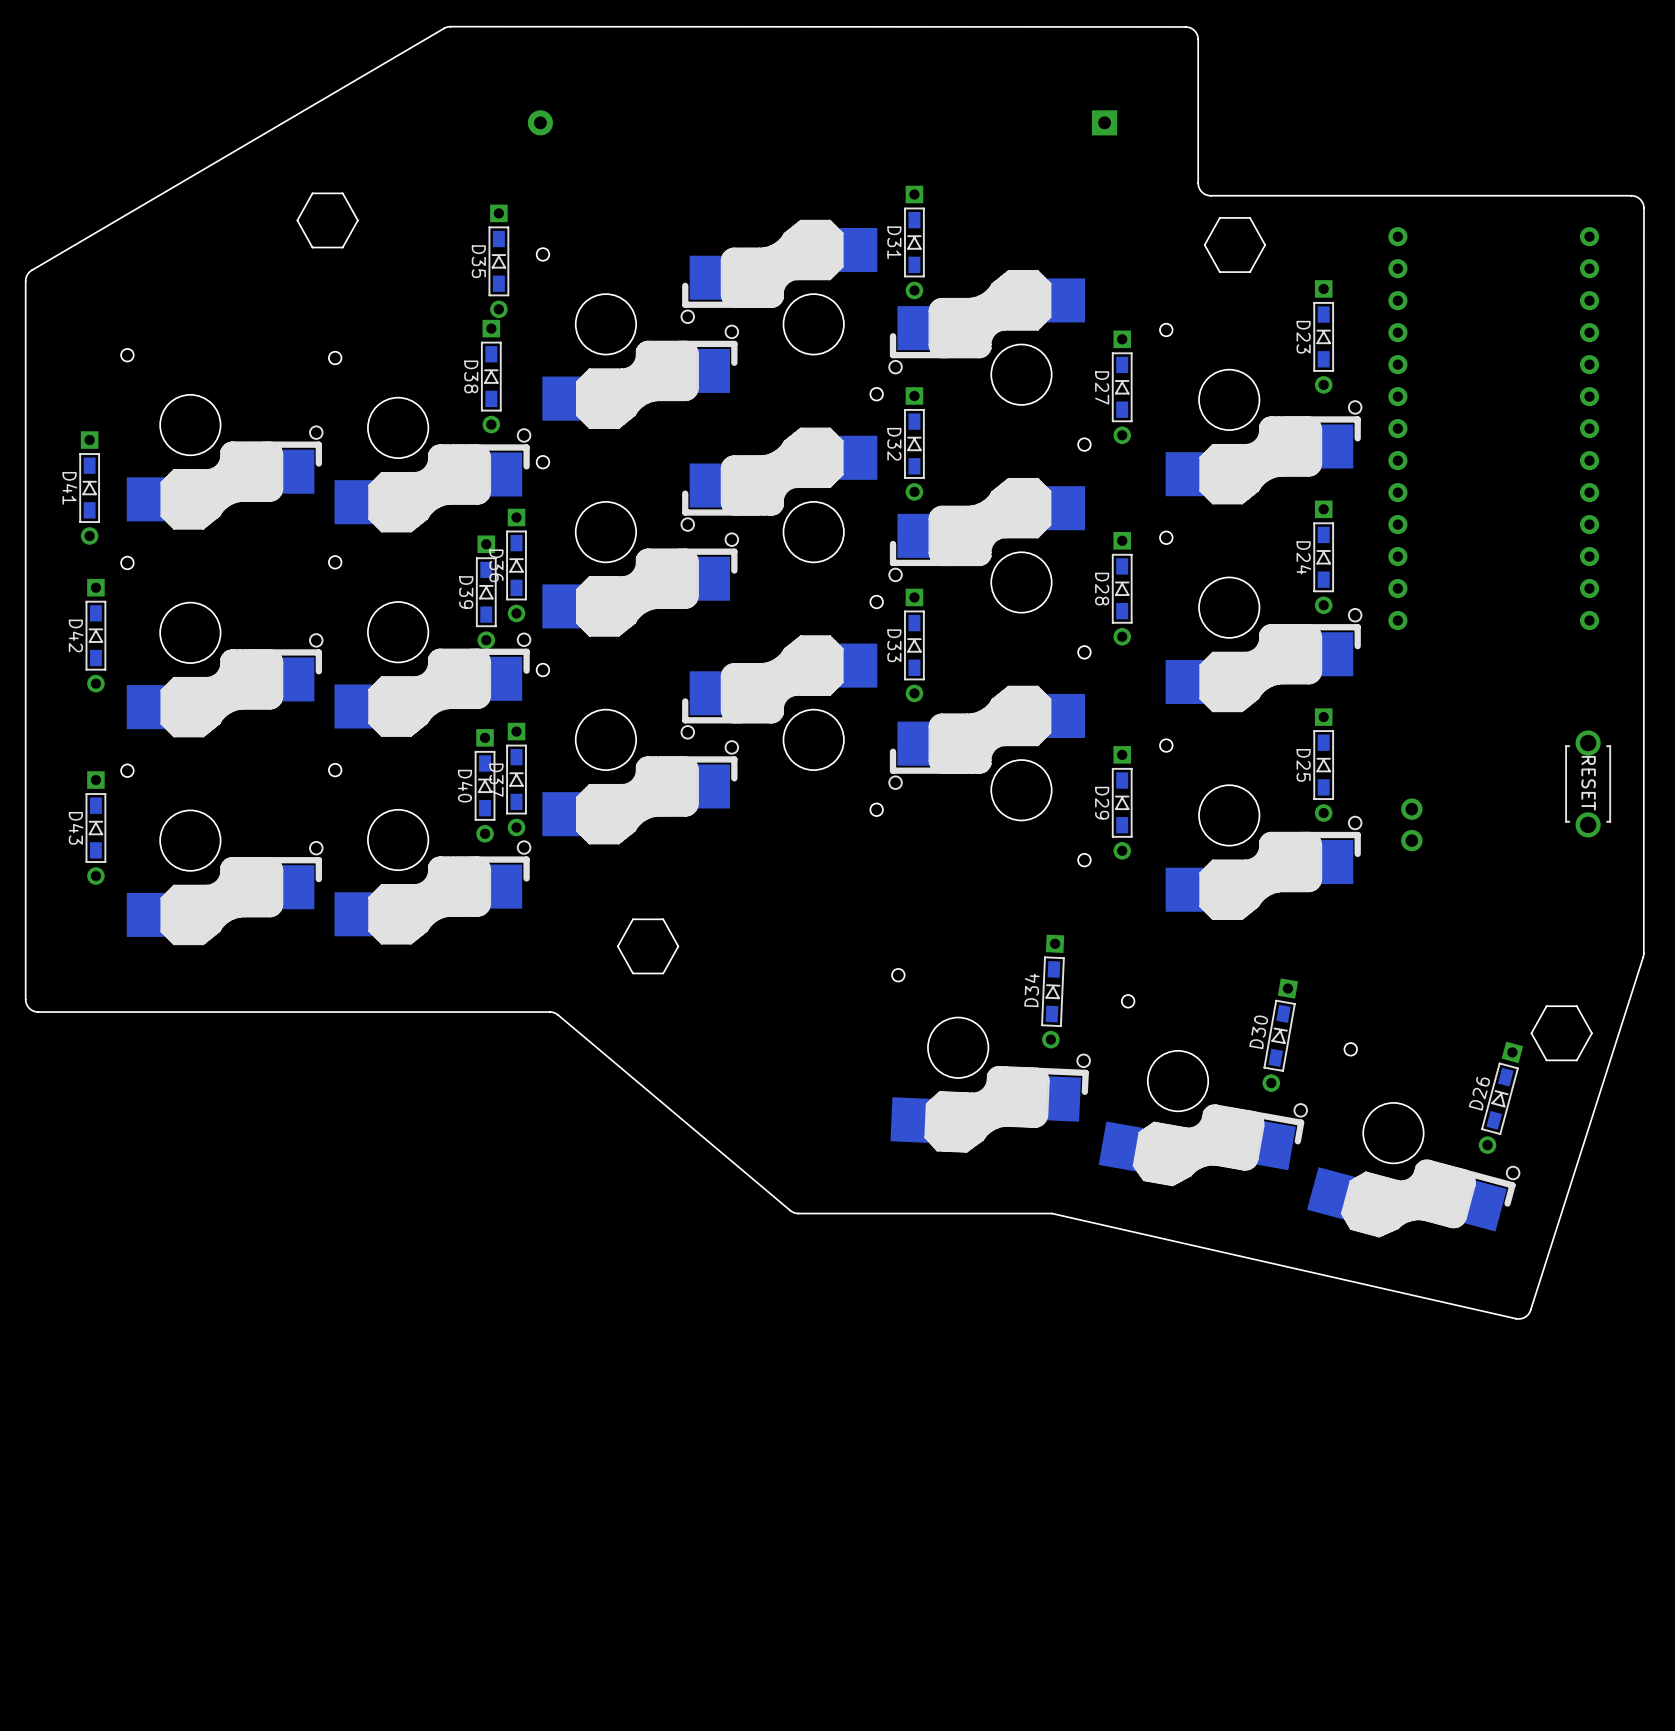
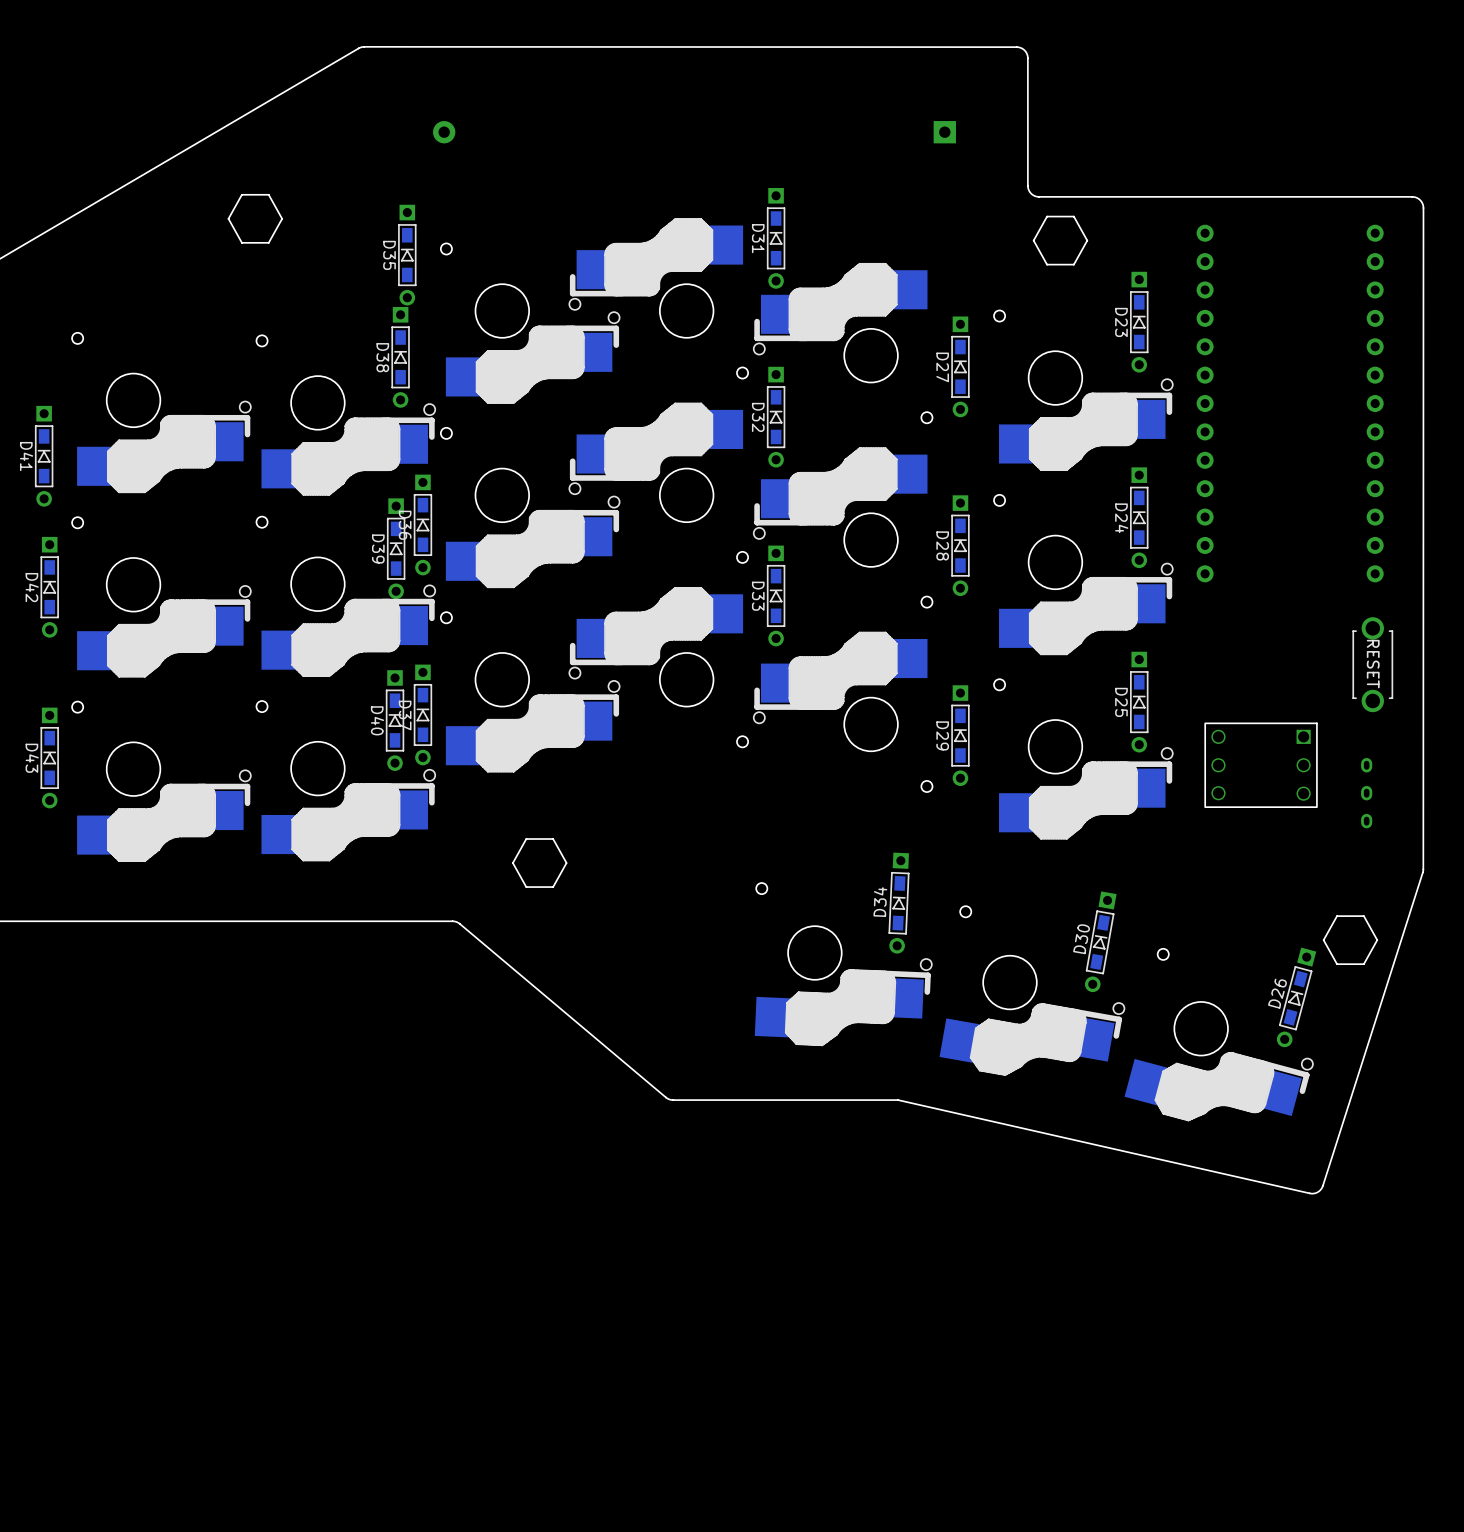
part position: (1588, 783) -> (1372, 664)
part: (1411, 824) -> none
part: none -> (1261, 765)
part: none -> (1366, 793)

